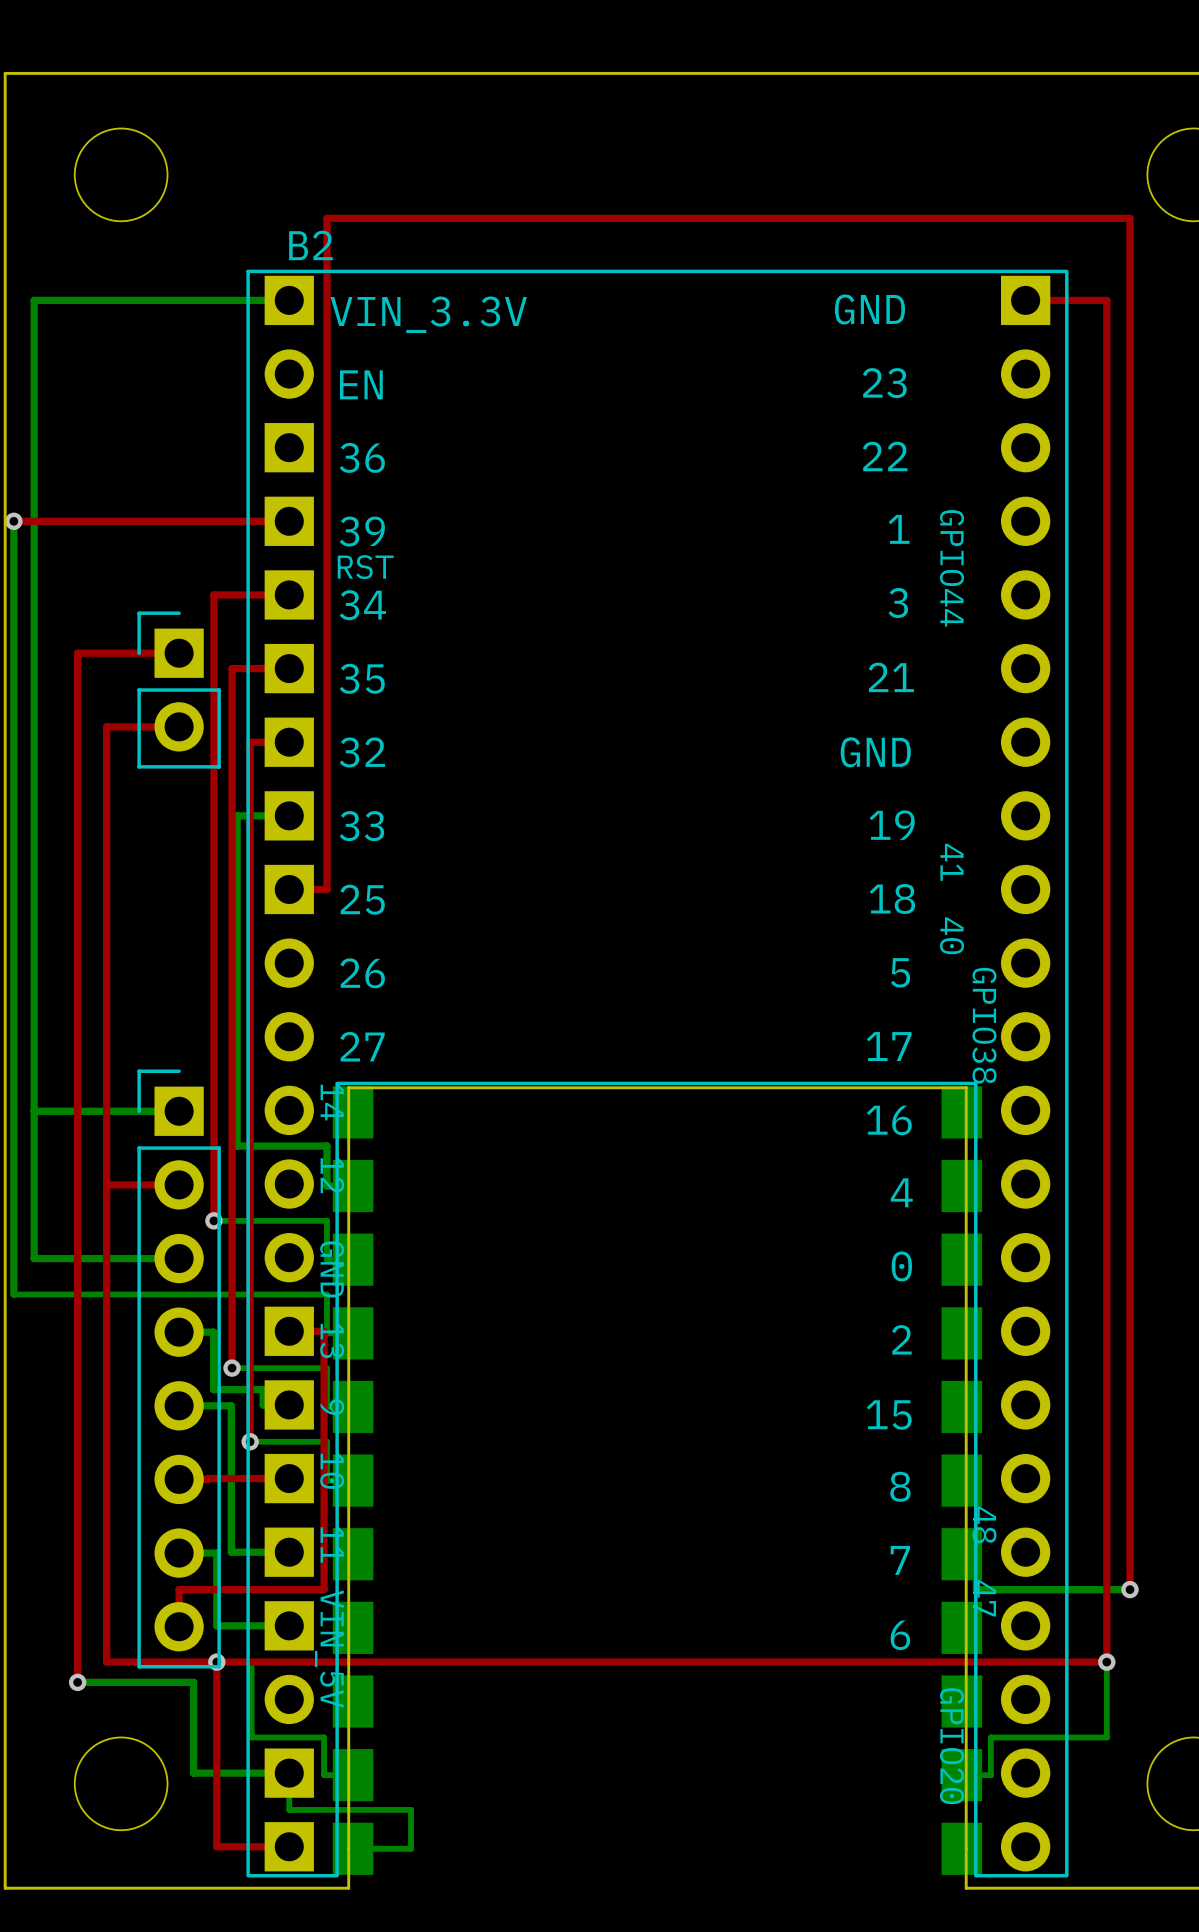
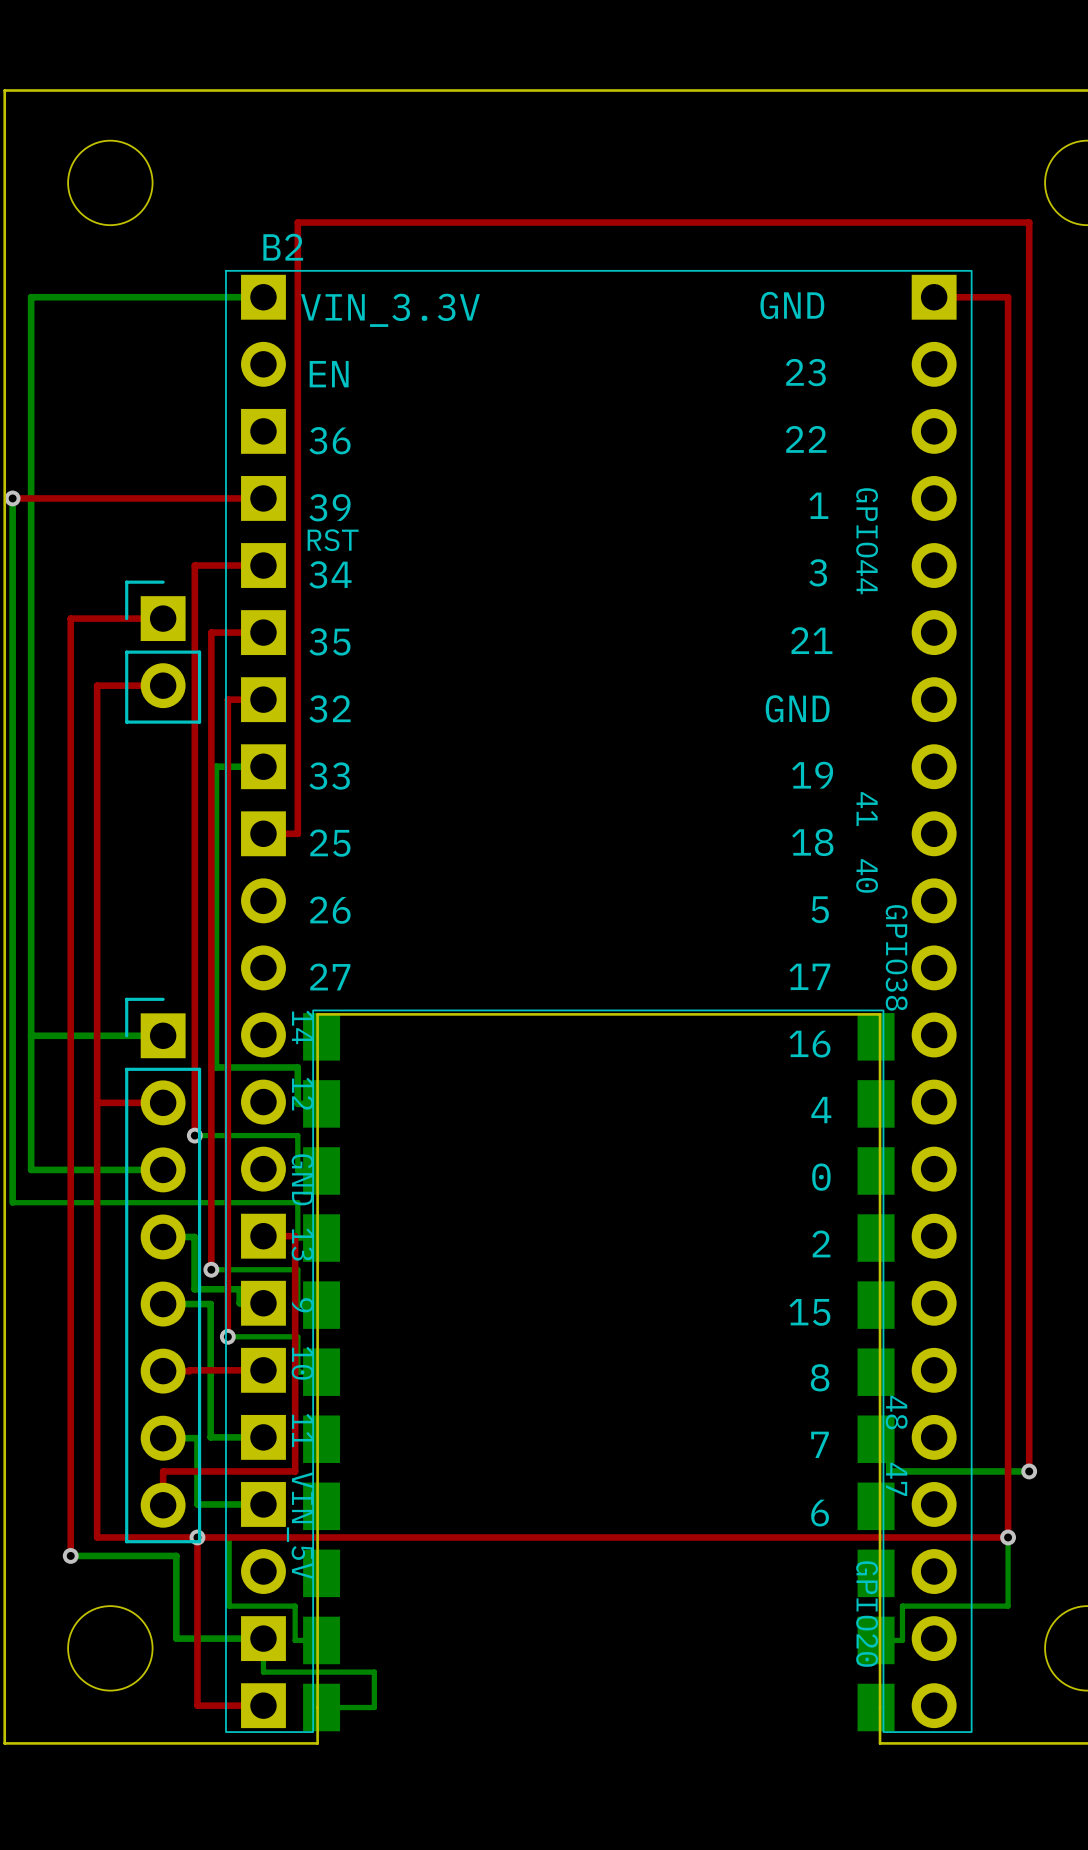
B2 footprint: [246, 269, 1069, 1878] -> [225, 270, 973, 1733]

